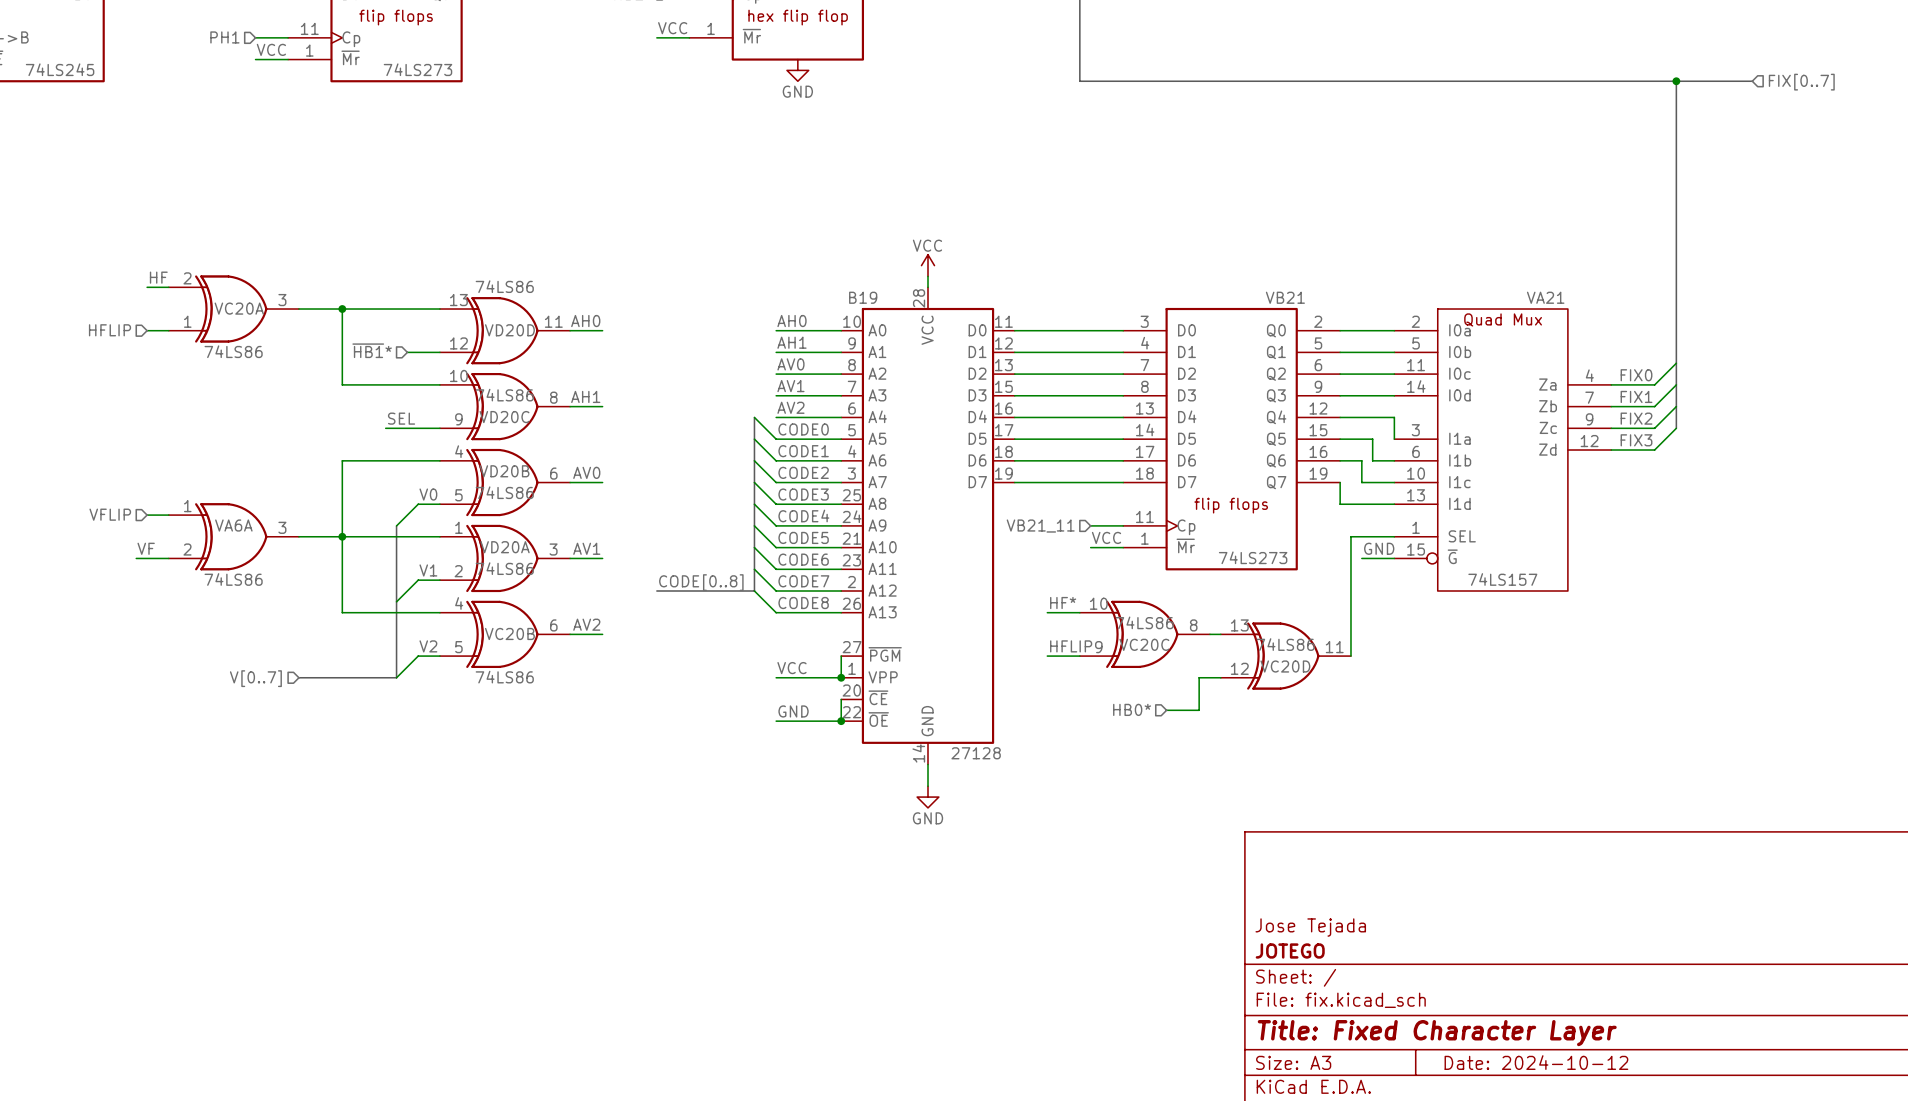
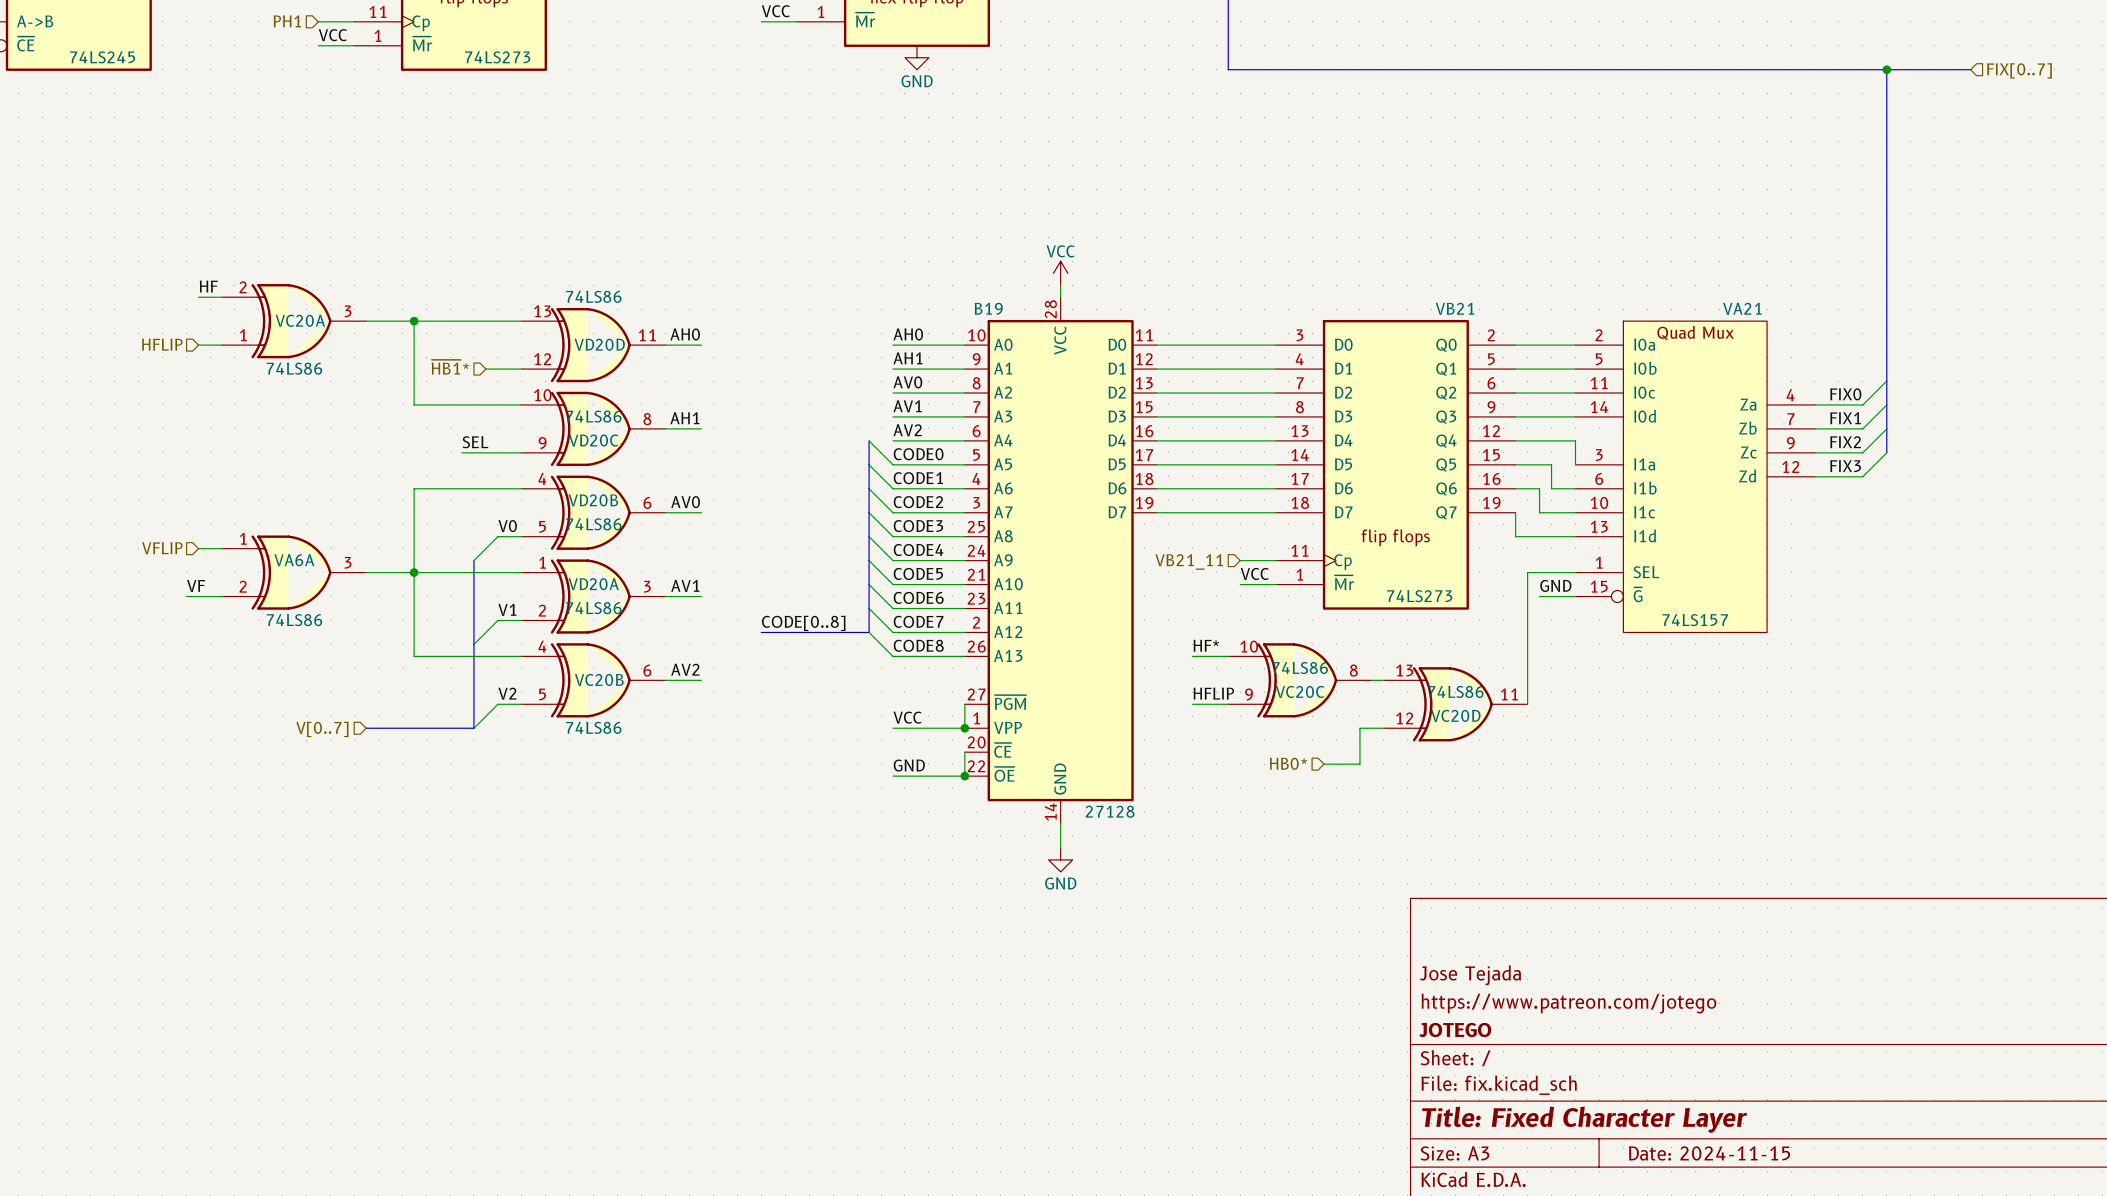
title block: none -> Jose Tejada (1470, 975)
title block: Jose Tejada (1310, 927) -> https://www.patreon.com/jotego (1568, 1003)
title block: Date: 2024-10-12 (1536, 1062) -> Date: 2024-11-15 (1709, 1153)

